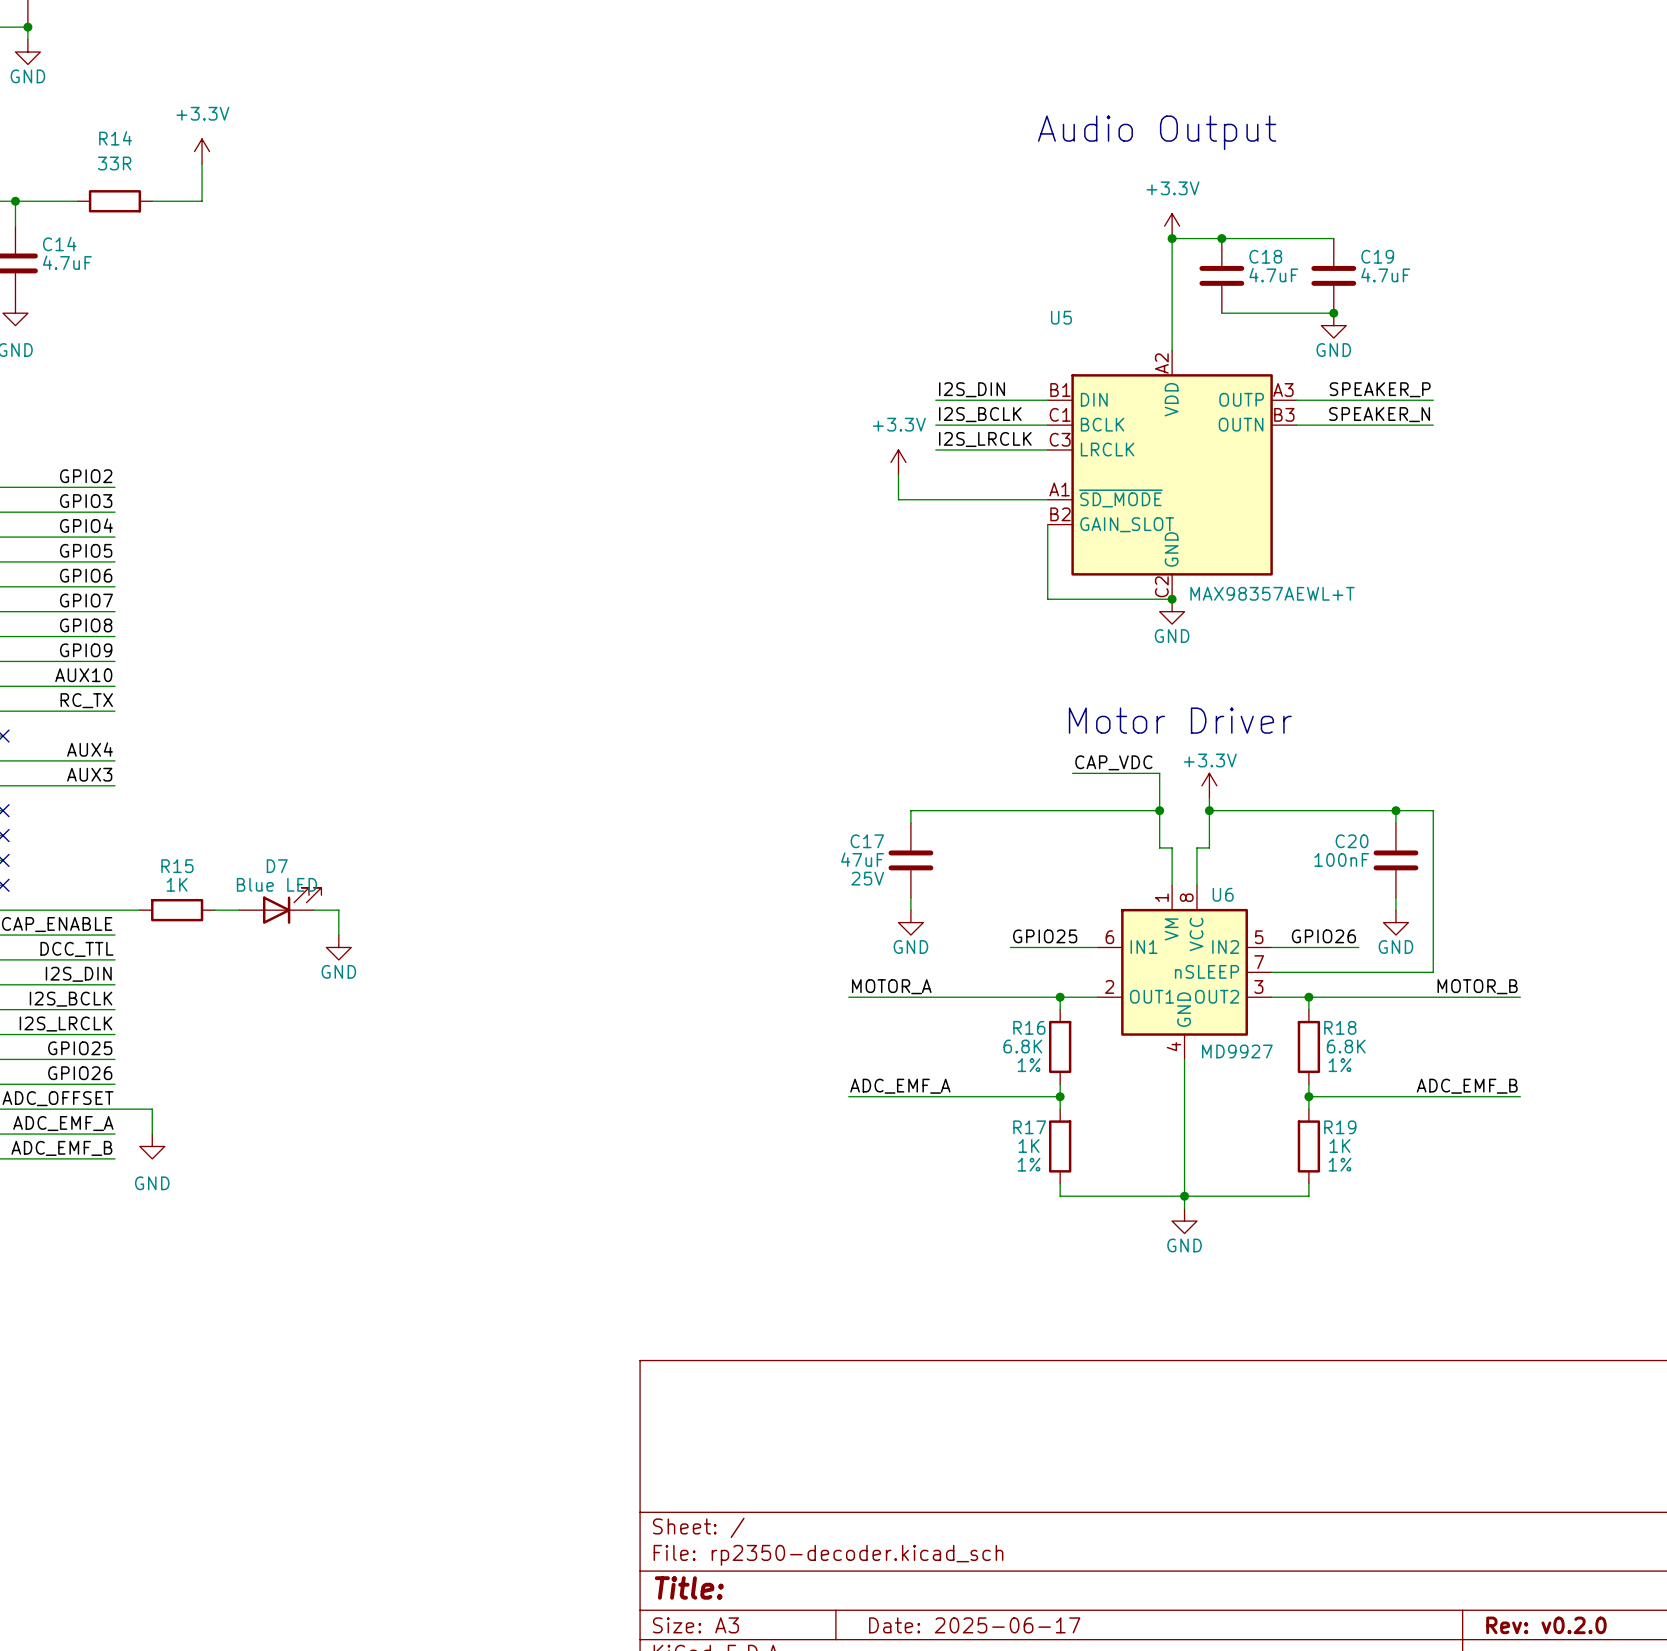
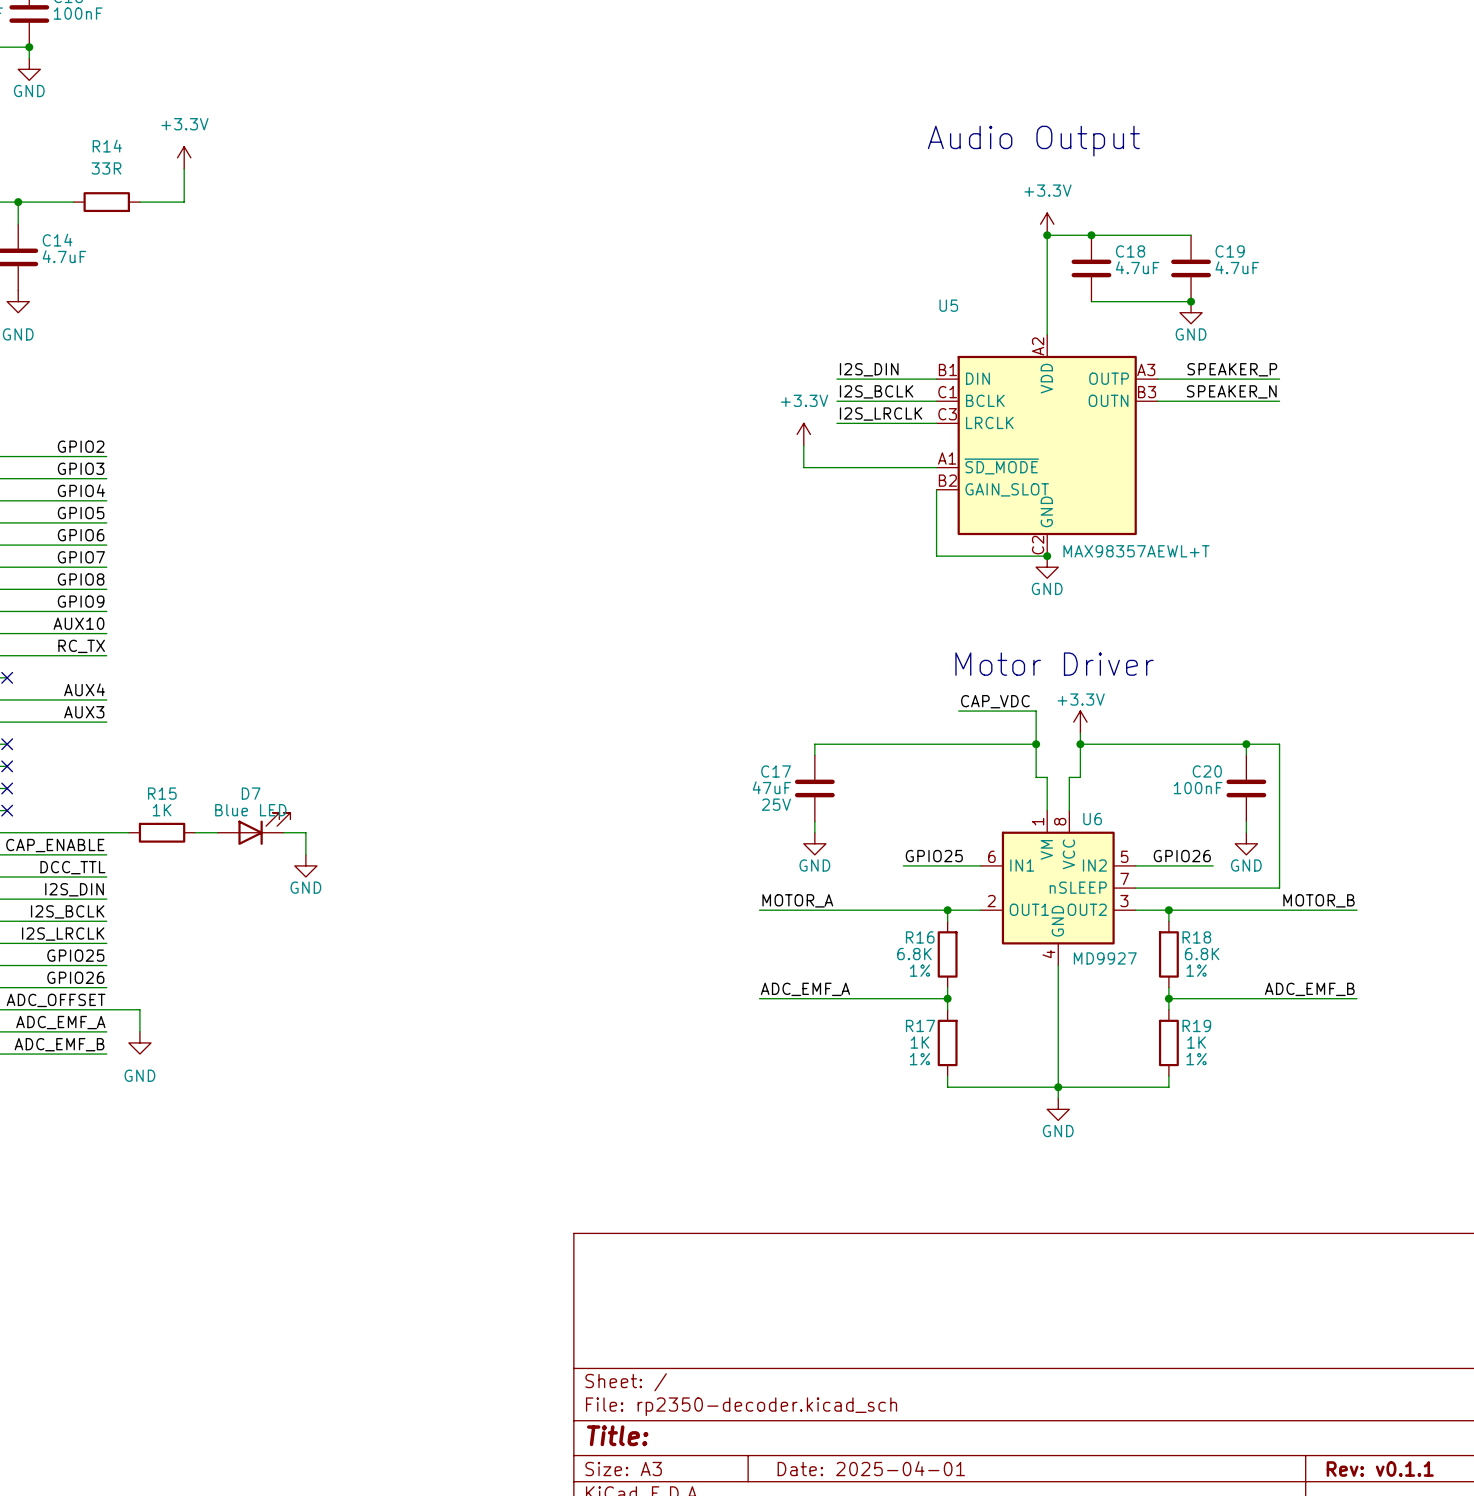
title block: Date: 2025-06-17 (974, 1625) -> Date: 2025-04-01 (871, 1468)
title block: Rev: v0.2.0 (1546, 1625) -> Rev: v0.1.1 (1380, 1469)

